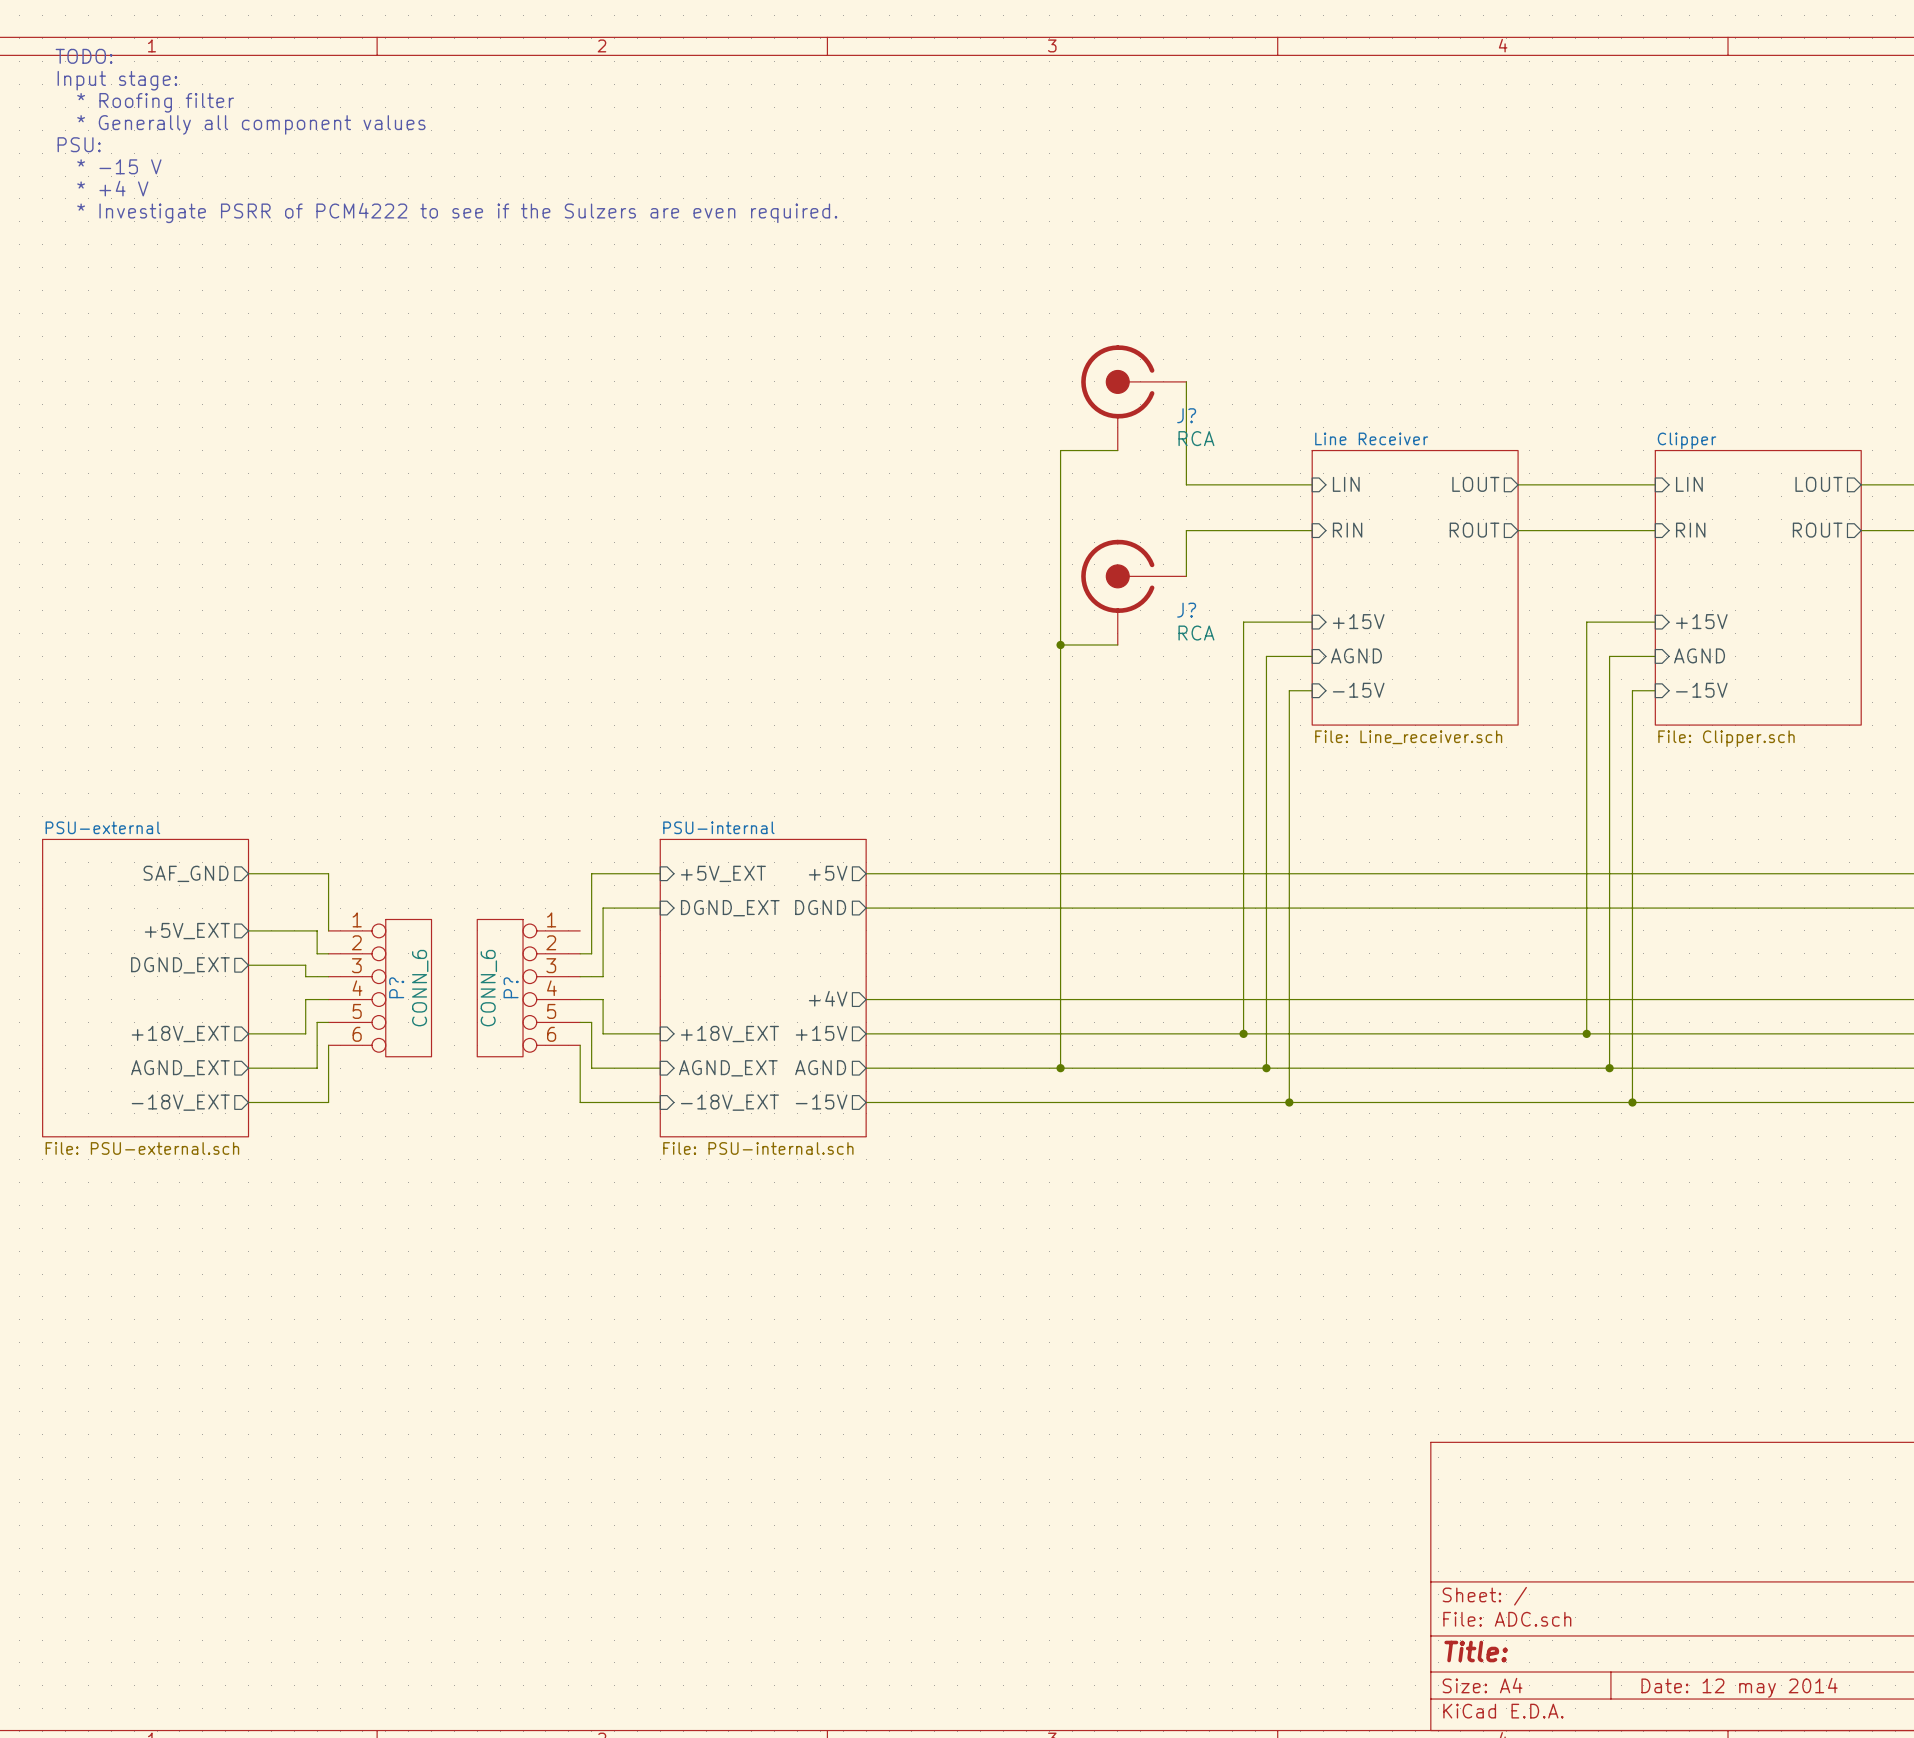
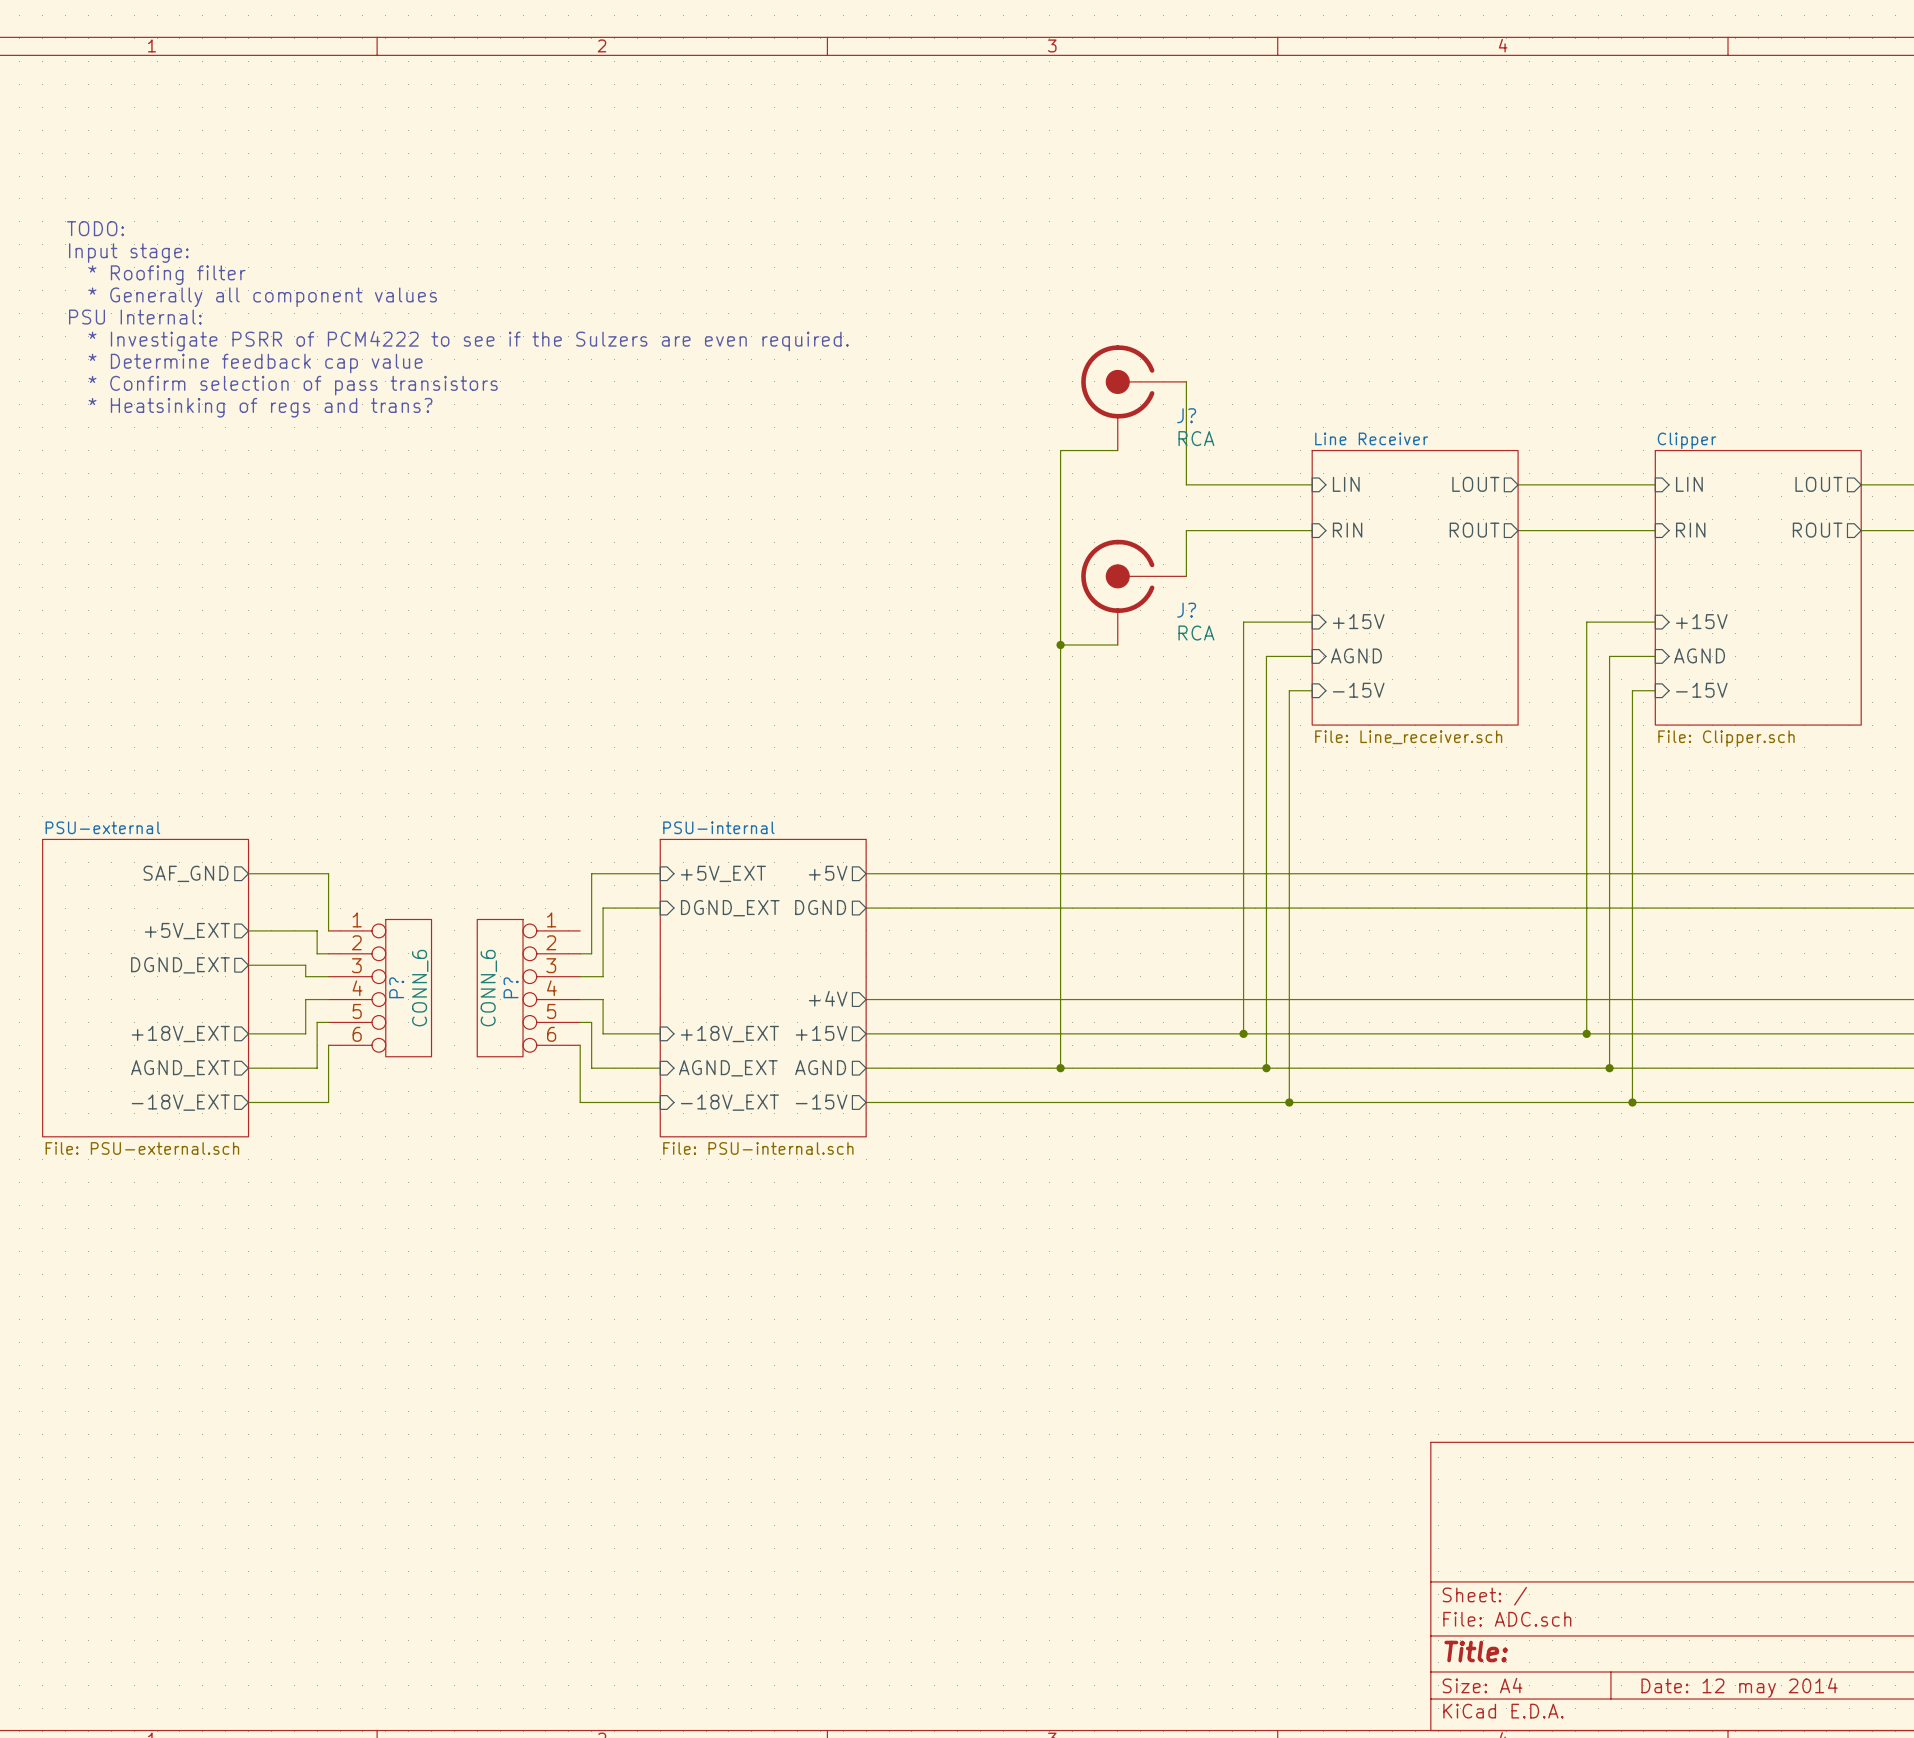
text position: TODO: (84, 56) -> TODO: (95, 228)
text position: Input stage: (117, 80) -> Input stage: (128, 253)
text position: * Roofing filter (155, 102) -> * Roofing filter (167, 275)
text position: * Generally all component values (251, 124) -> * Generally all component values (262, 297)
text: PSU: (79, 144) -> none
text: * -15 V (119, 166) -> none
text: * +4 V (112, 188) -> none
text position: * Investigate PSRR of PCM4222 to see if the Sulzers are even required. (457, 212) -> * Investigate PSRR of PCM4222 to see if the Sulzers are even required. (468, 341)
text: none -> PSU Internal: (135, 317)
text: none -> * Determine feedback cap value (255, 363)
text: none -> * Confirm selection of pass transistors (293, 385)
text: none -> * Heatsinking of regs and trans? (260, 407)

